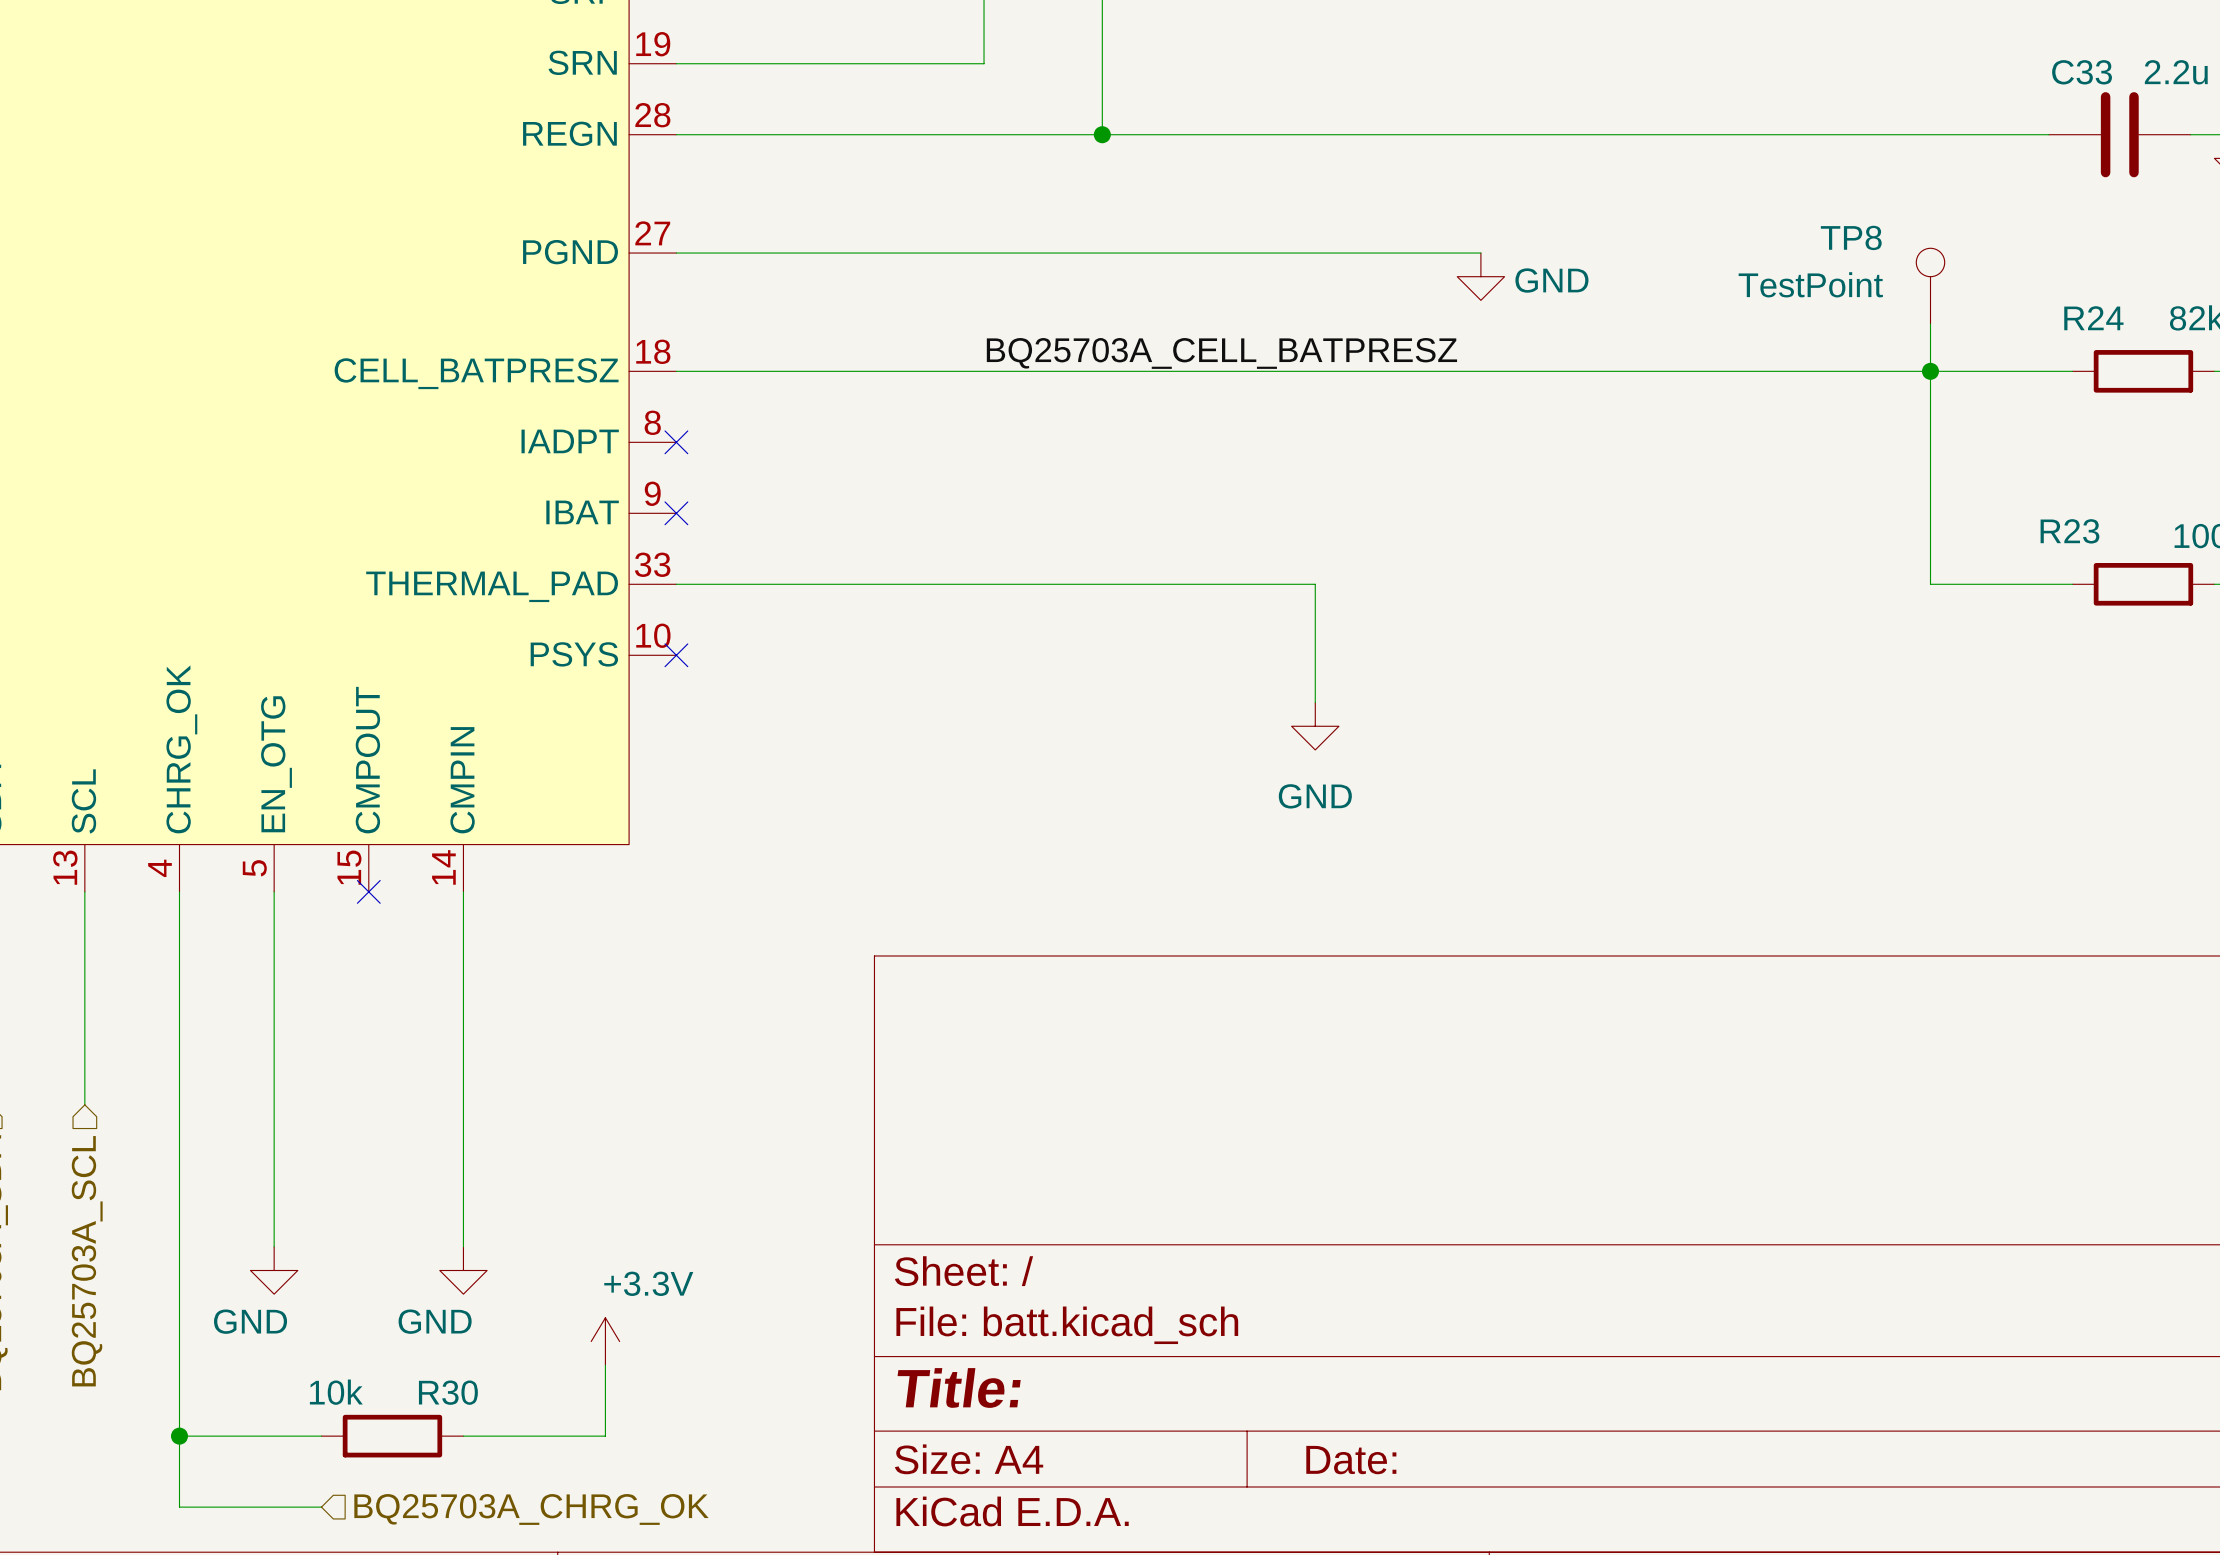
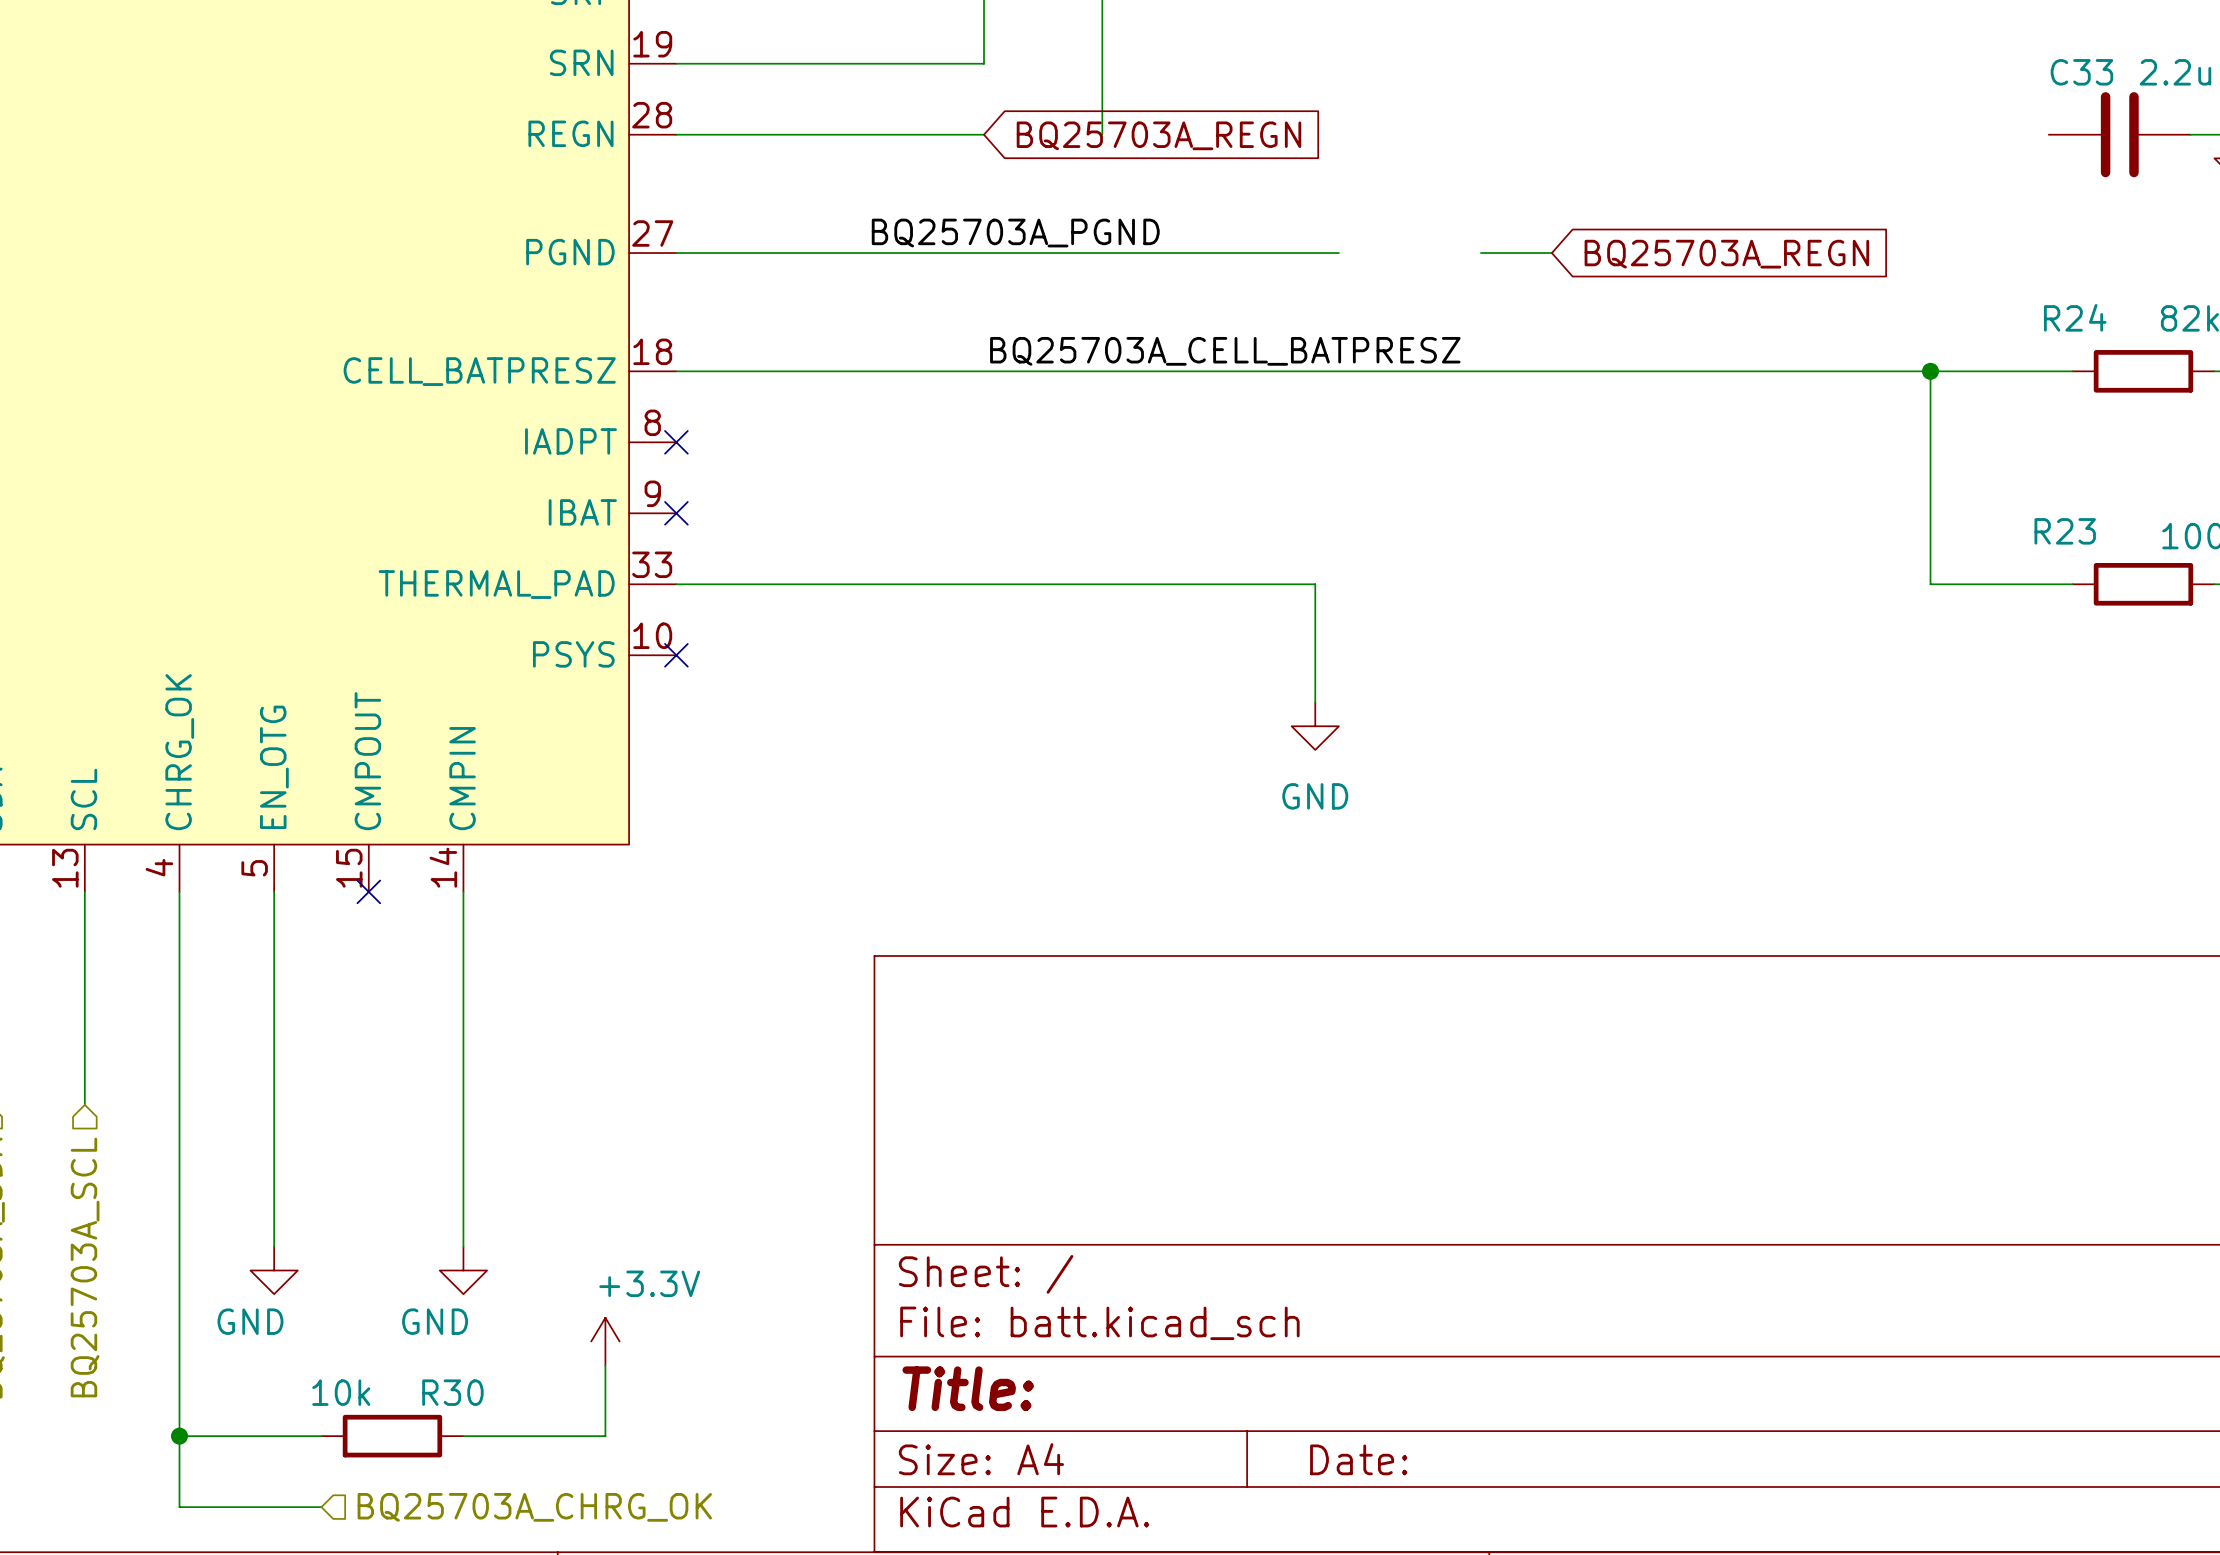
wire: (984, 134) (2048, 134) -> none
junction: (1102, 134) -> none
global label: none -> BQ25703A_REGN (1158, 135)
label: none -> BQ25703A_PGND (1015, 233)
wire: (1338, 253) (1480, 253) -> (1551, 253) (1480, 253)
global label: none -> BQ25703A_REGN (1726, 254)
power symbol: GND (1480, 276) -> none
TP8: TestPoint (1930, 286) -> none
R24 name position: R24 (2093, 318) -> R24 (2075, 317)
wire: (1930, 324) (1930, 371) -> none

